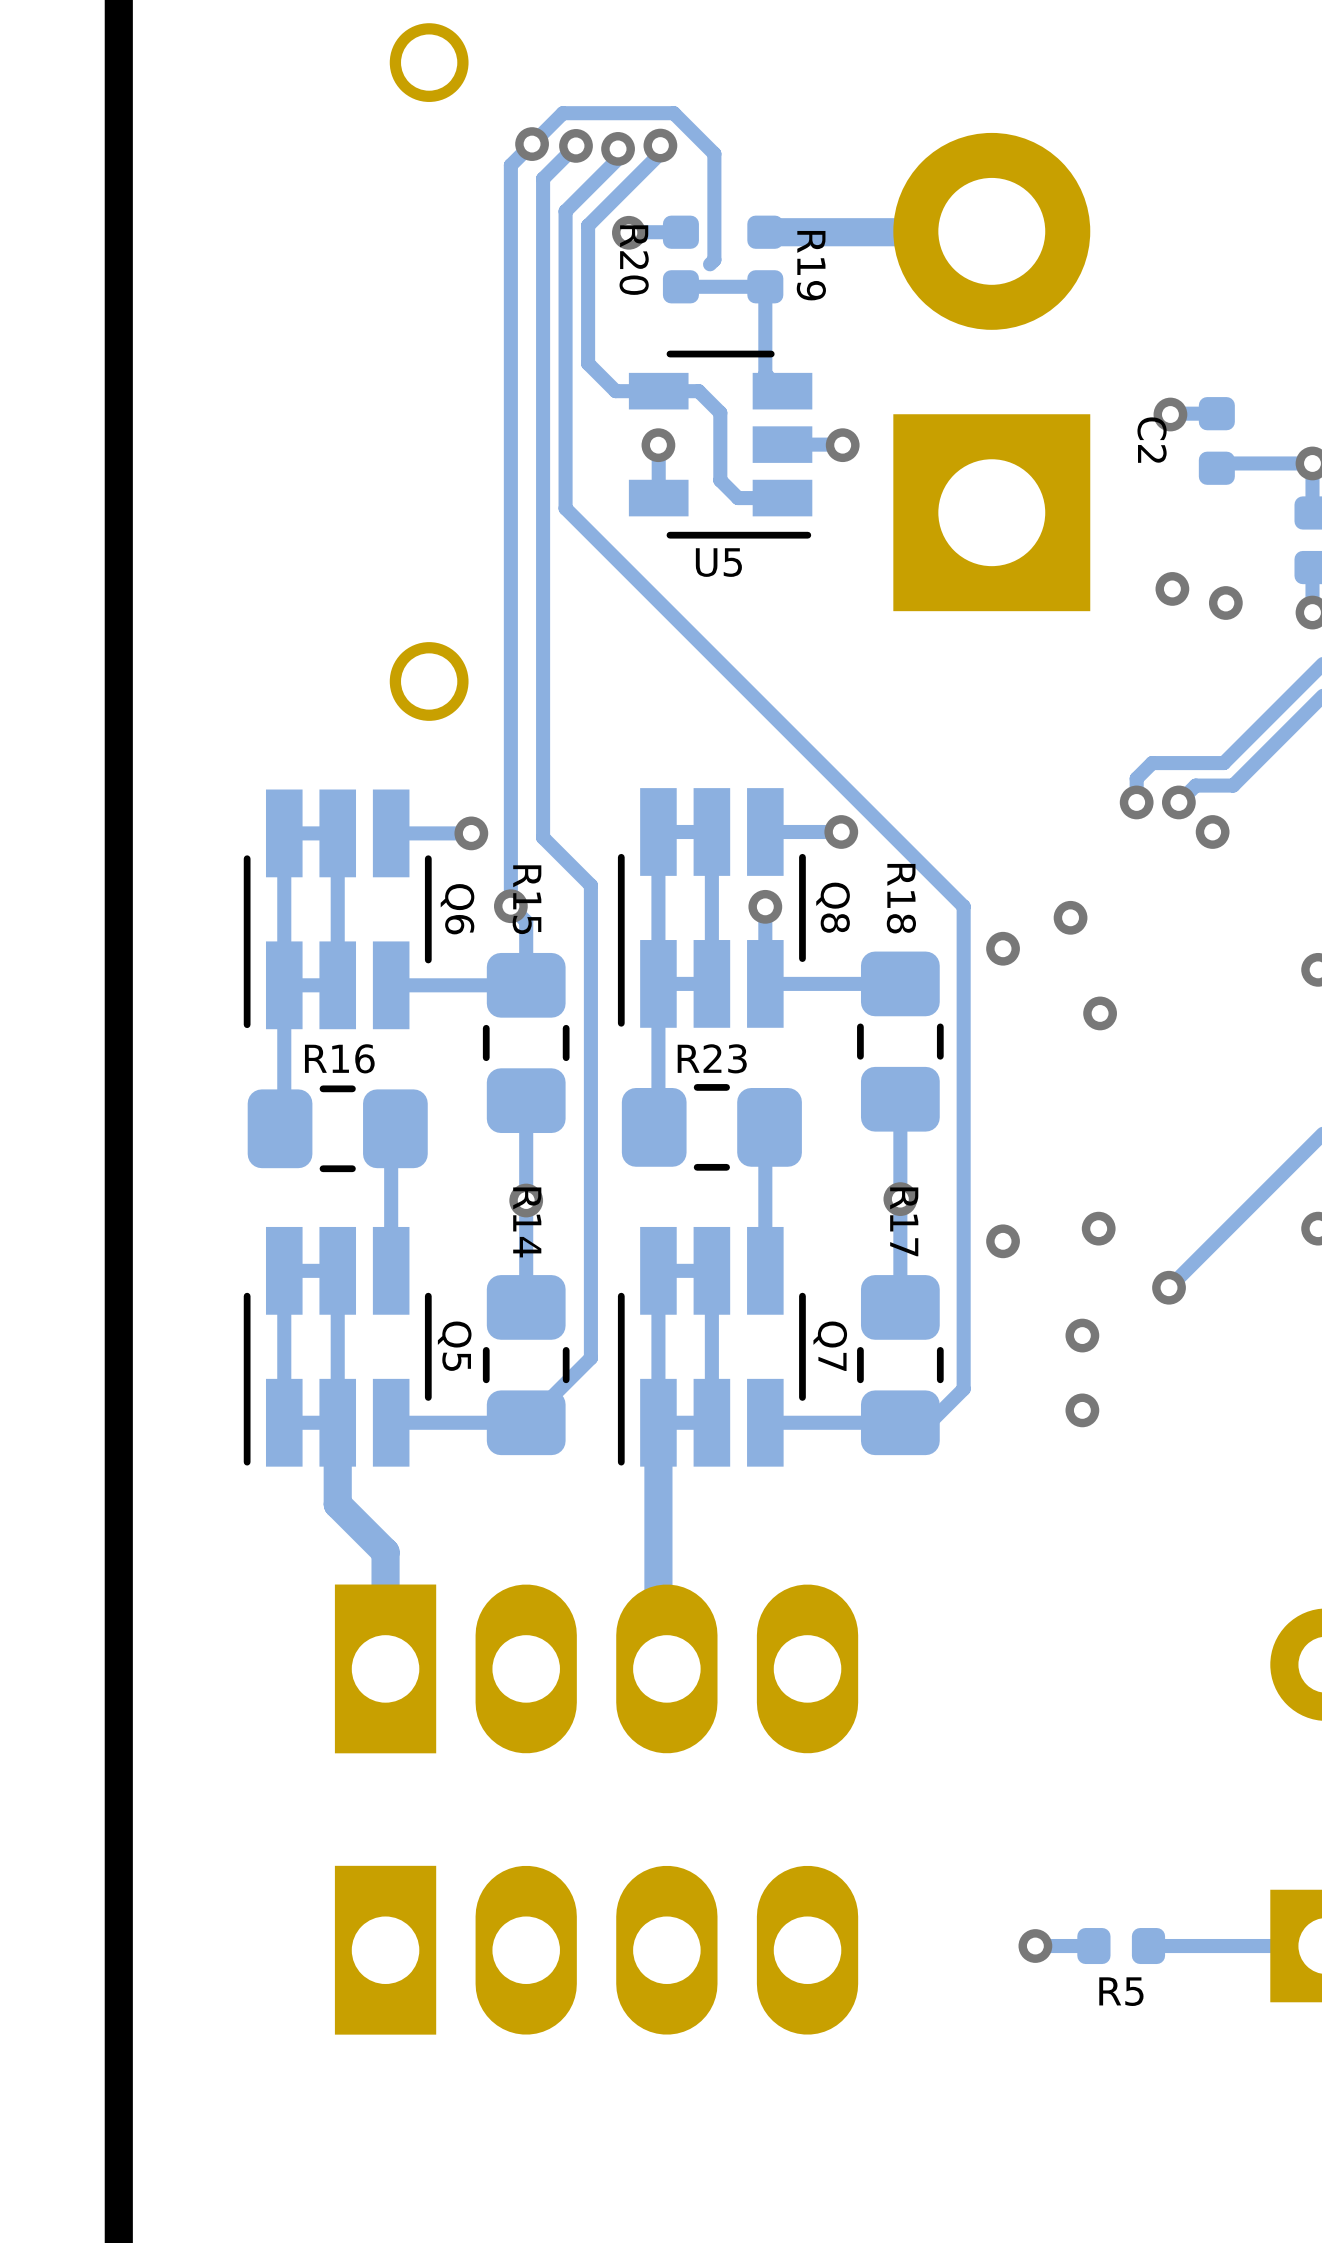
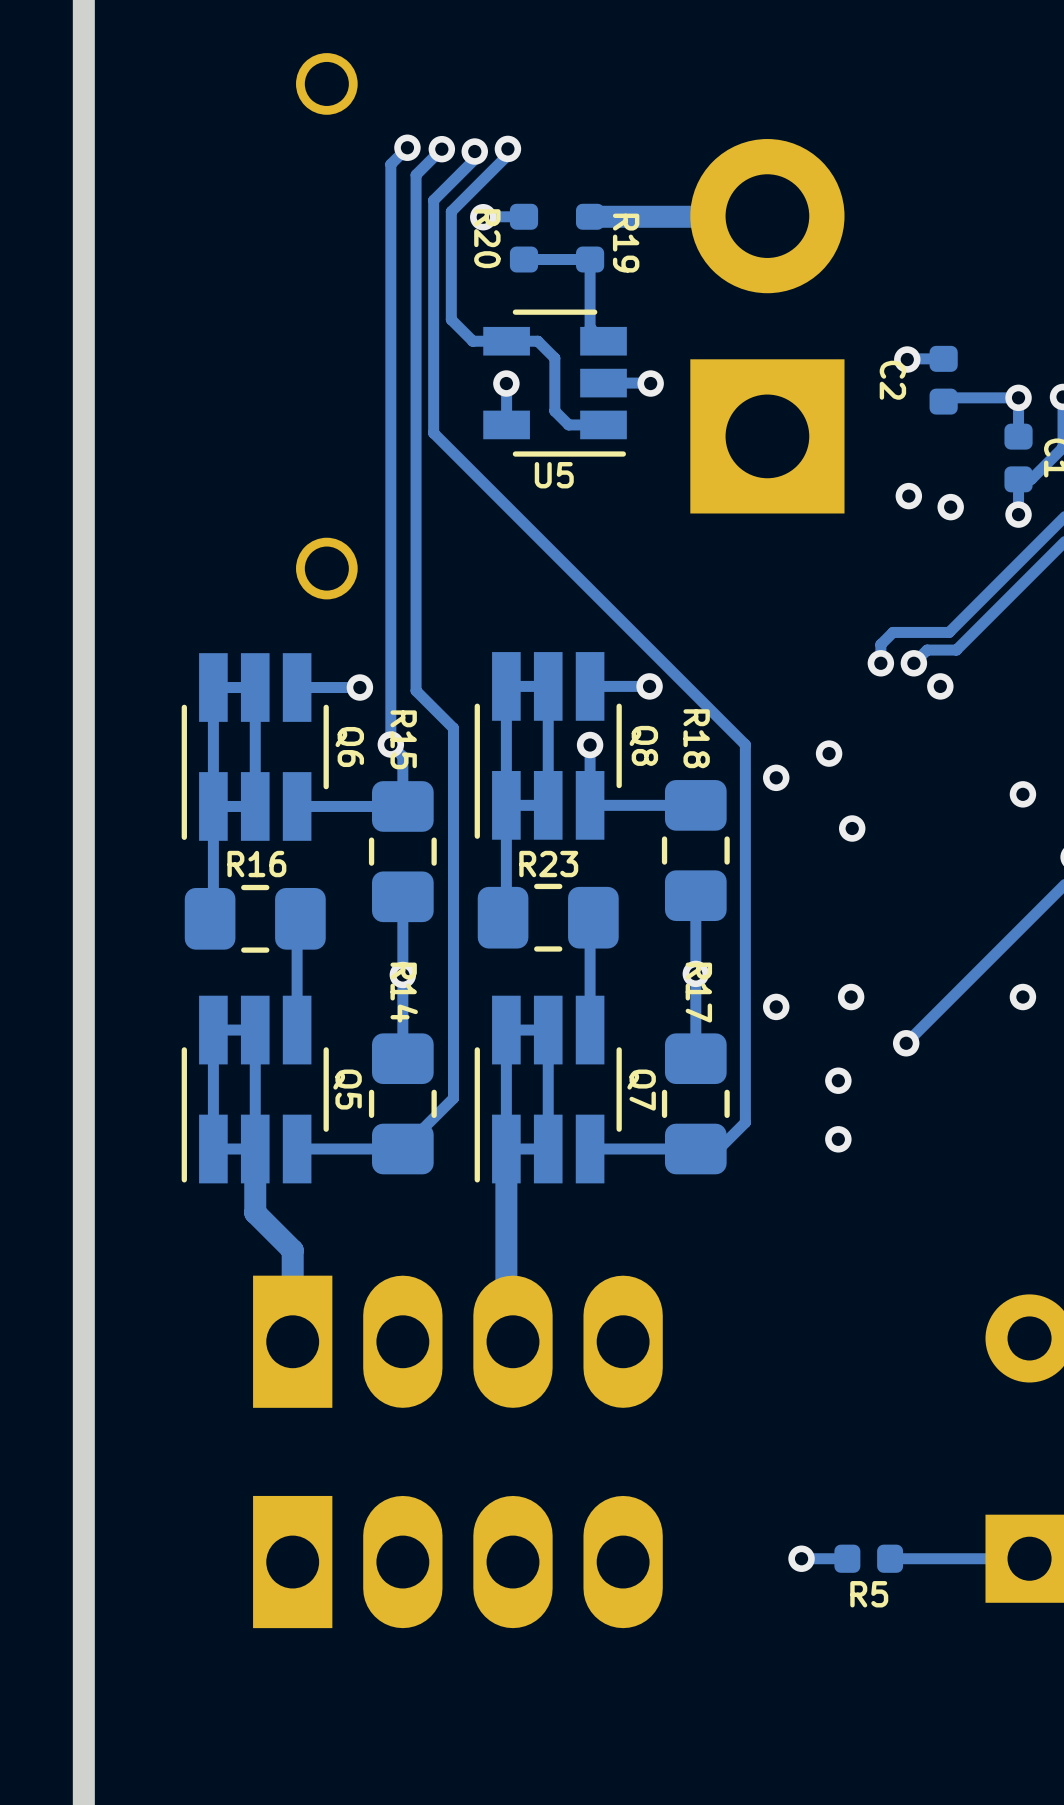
track: (532, 144) (562, 113) (673, 113) (714, 153) (714, 259) (710, 264) -> none

